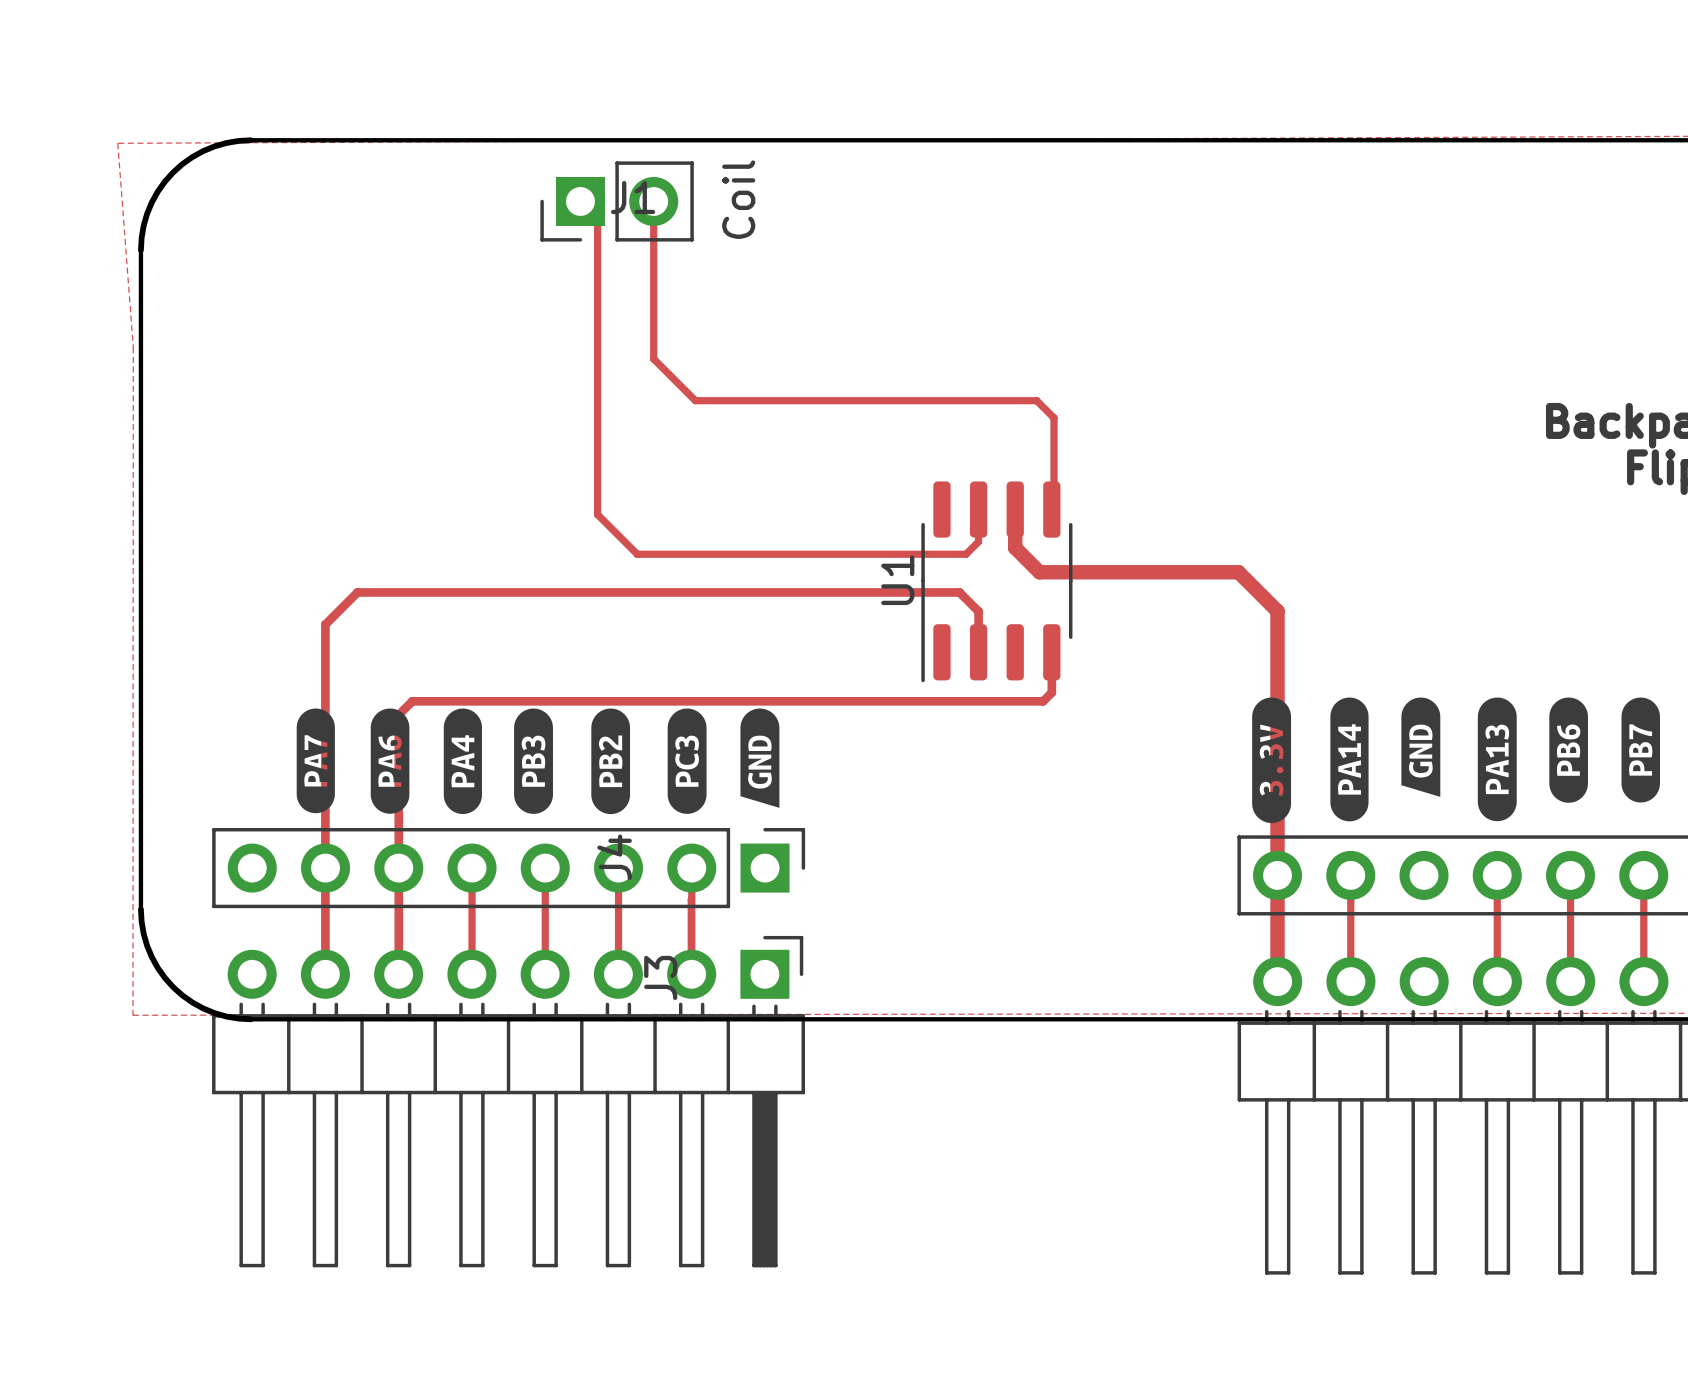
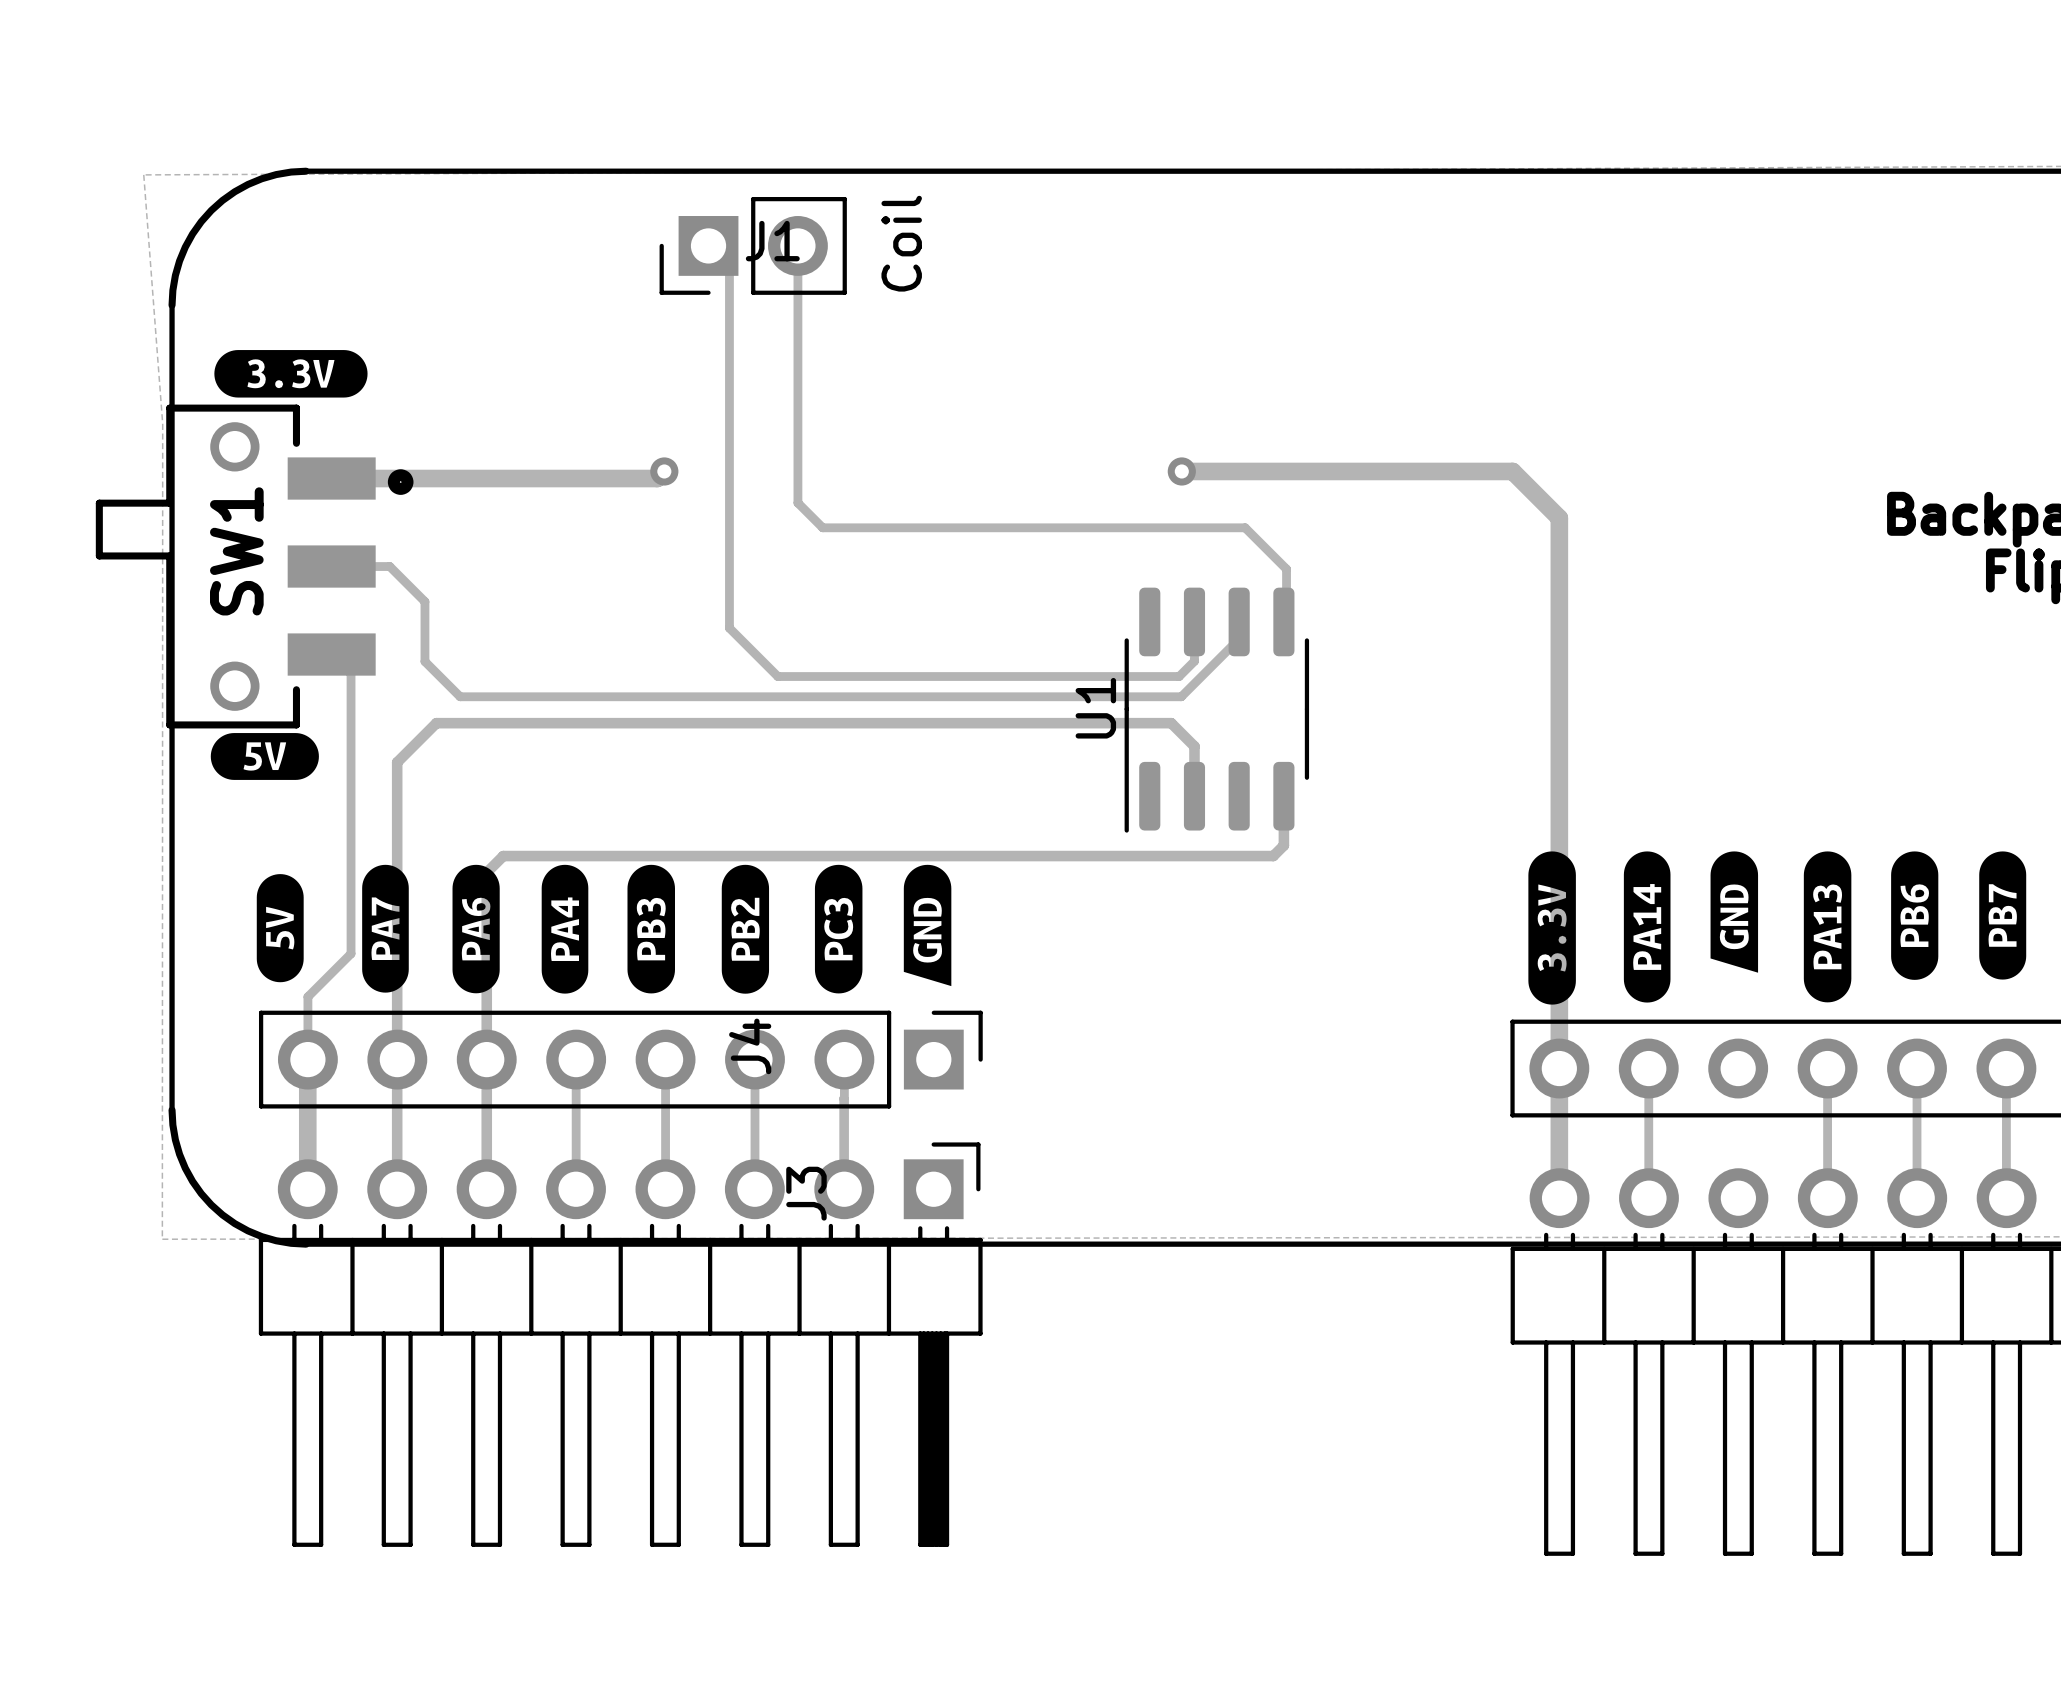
drawing: none -> [214, 350, 368, 398]
track: (653, 358) (695, 400) (1036, 400) (1054, 417) (1054, 466) -> (797, 438) (797, 502) (822, 527) (1245, 527) (1286, 569)
track: none -> (664, 471) (657, 478) (331, 478)
via: none -> (664, 471)
via: none -> (1181, 471)
SW1: none -> (254, 566)
track: none -> (331, 566) (389, 566) (424, 601) (424, 661) (460, 696) (1181, 696) (1239, 638)
track: (1015, 523) (1015, 547) (1039, 572) (1238, 572) (1277, 611) -> (1181, 471) (1512, 471) (1559, 518) (1559, 746)
track: none -> (331, 654) (351, 673) (351, 953) (307, 996) (307, 1189)
drawing: none -> [210, 733, 319, 780]
drawing: none -> [256, 874, 304, 983]

